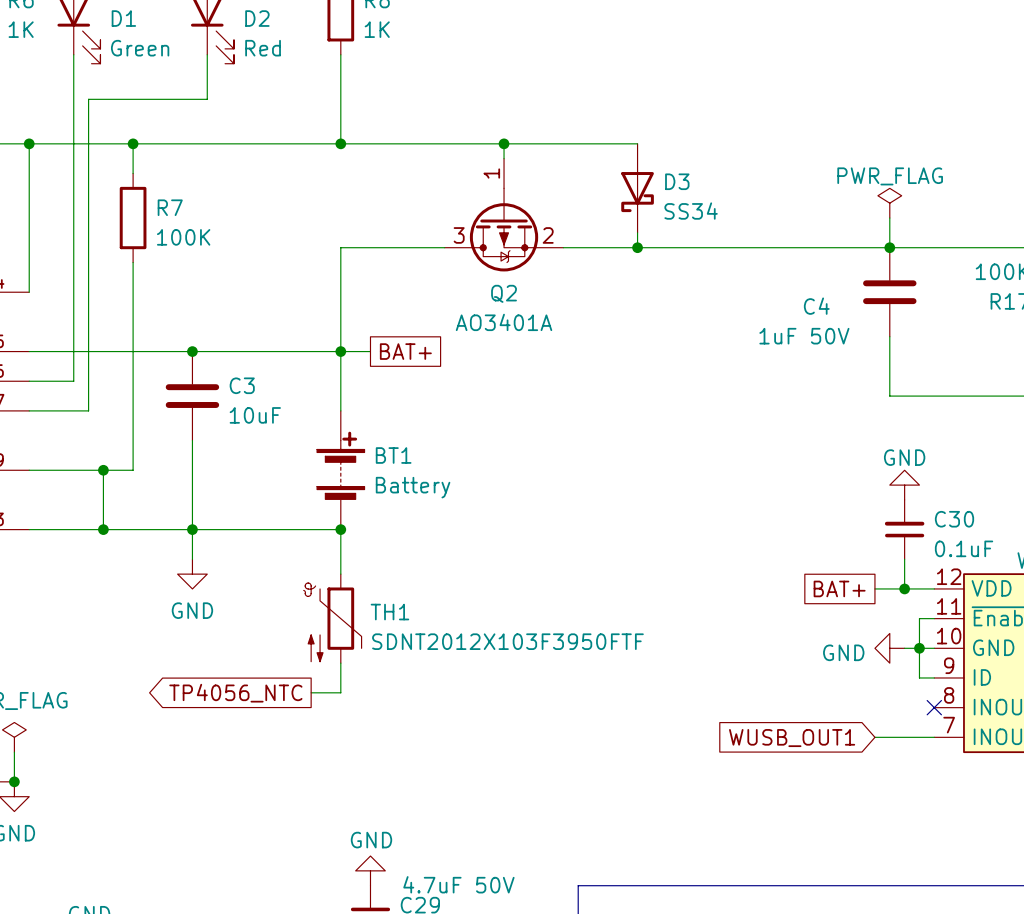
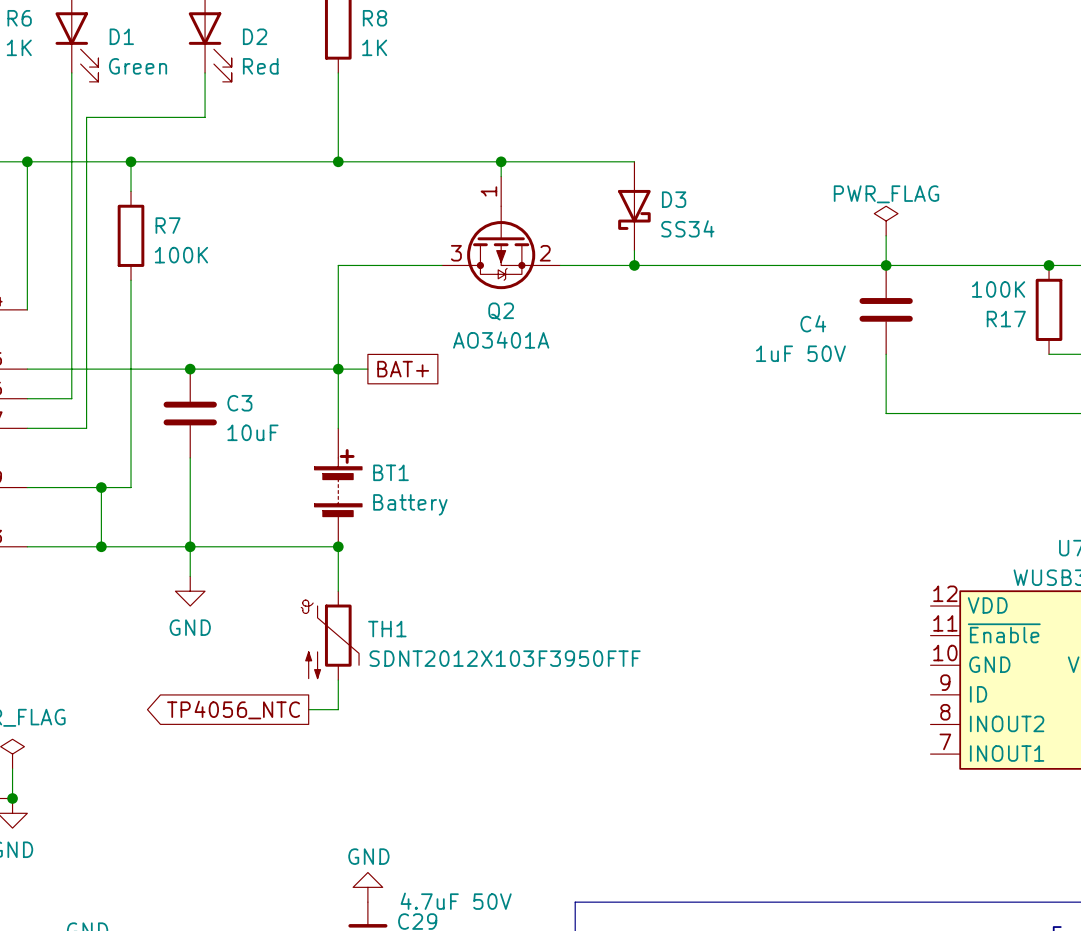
power symbol: GND (904, 485) -> none
C30: 0.1uF (904, 529) -> none
wire: (904, 559) (904, 588) -> none
global label: BAT+ (839, 588) -> none
wire: (874, 588) (934, 588) -> none
junction: (904, 588) -> none
wire: (934, 618) (919, 618) (919, 677) (934, 677) -> none
power symbol: GND (889, 648) -> none
wire: (904, 648) (934, 648) -> none
junction: (919, 648) -> none
no-connect mark: (934, 707) -> none
wire: (874, 737) (934, 737) -> none
global label: WUSB_OUT1 (792, 738) -> none

